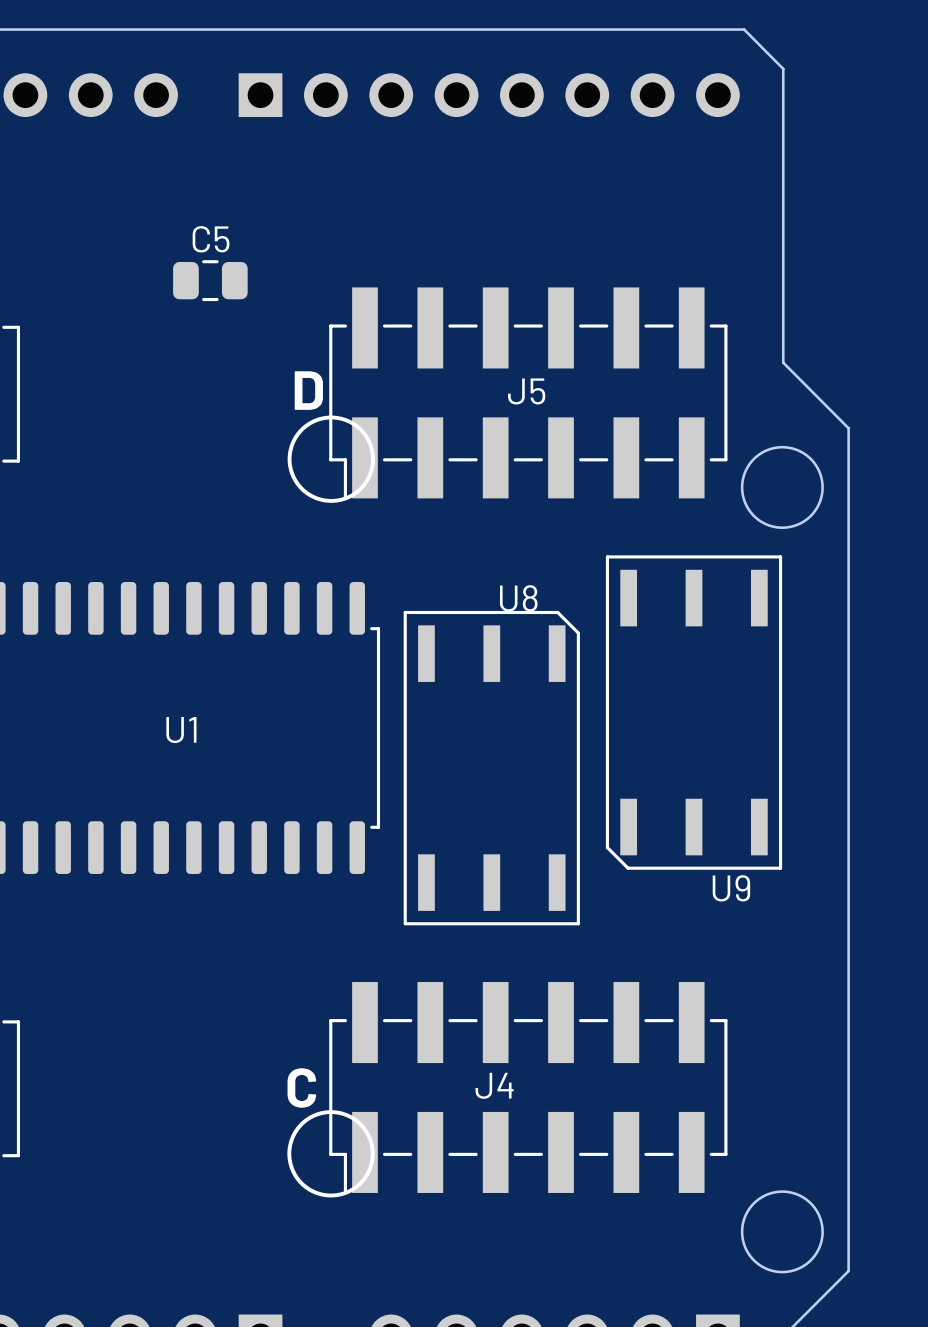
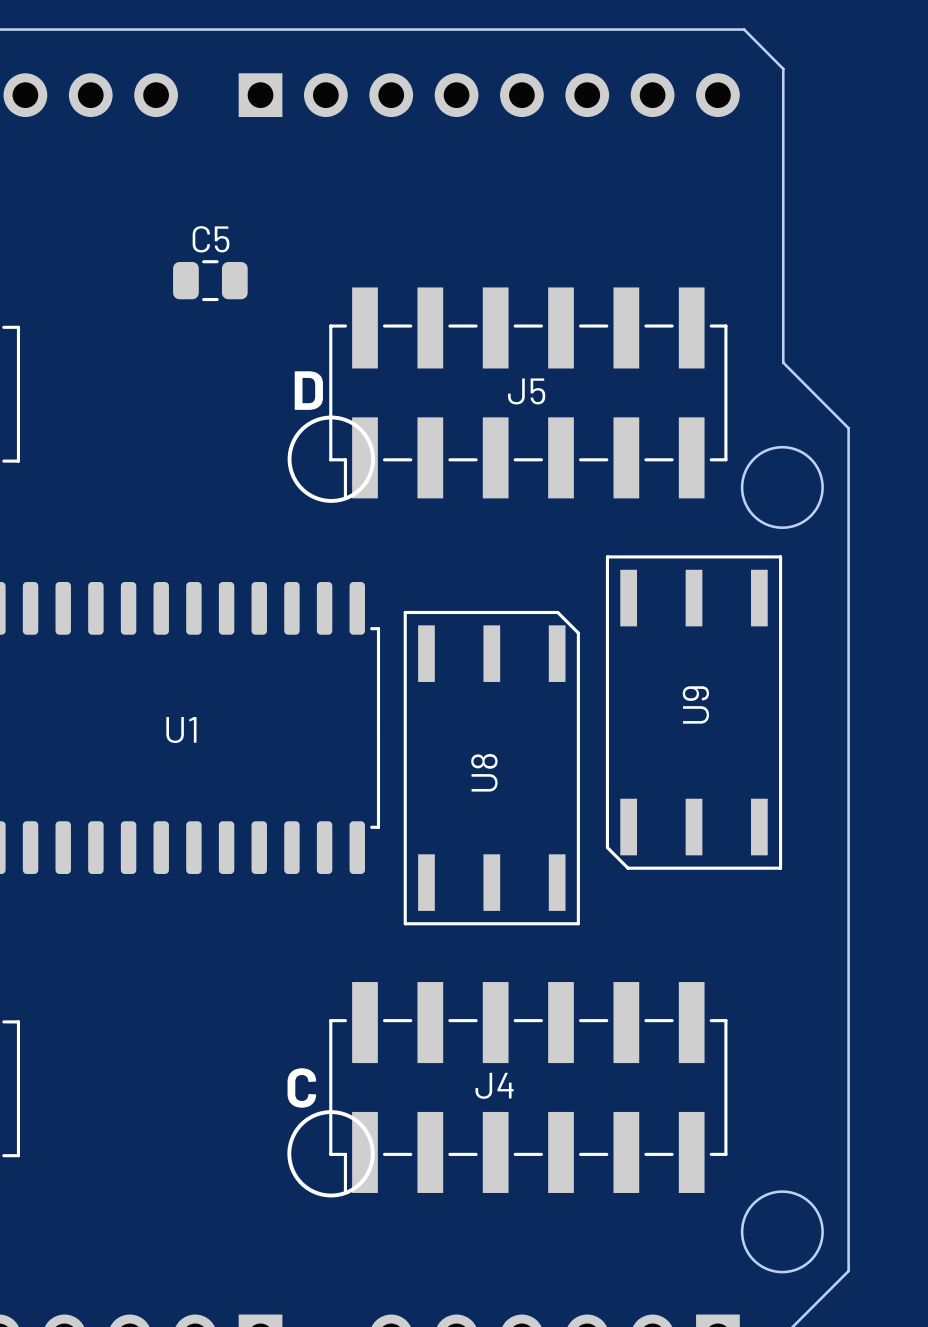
U8 name rotation: 0° (518, 598) -> 90° counterclockwise (484, 772)
U8 name position: U8 (518, 598) -> U8 (484, 772)
U9 name rotation: 0° (731, 888) -> 90° counterclockwise (695, 704)
U9 name position: U9 (731, 888) -> U9 (695, 704)

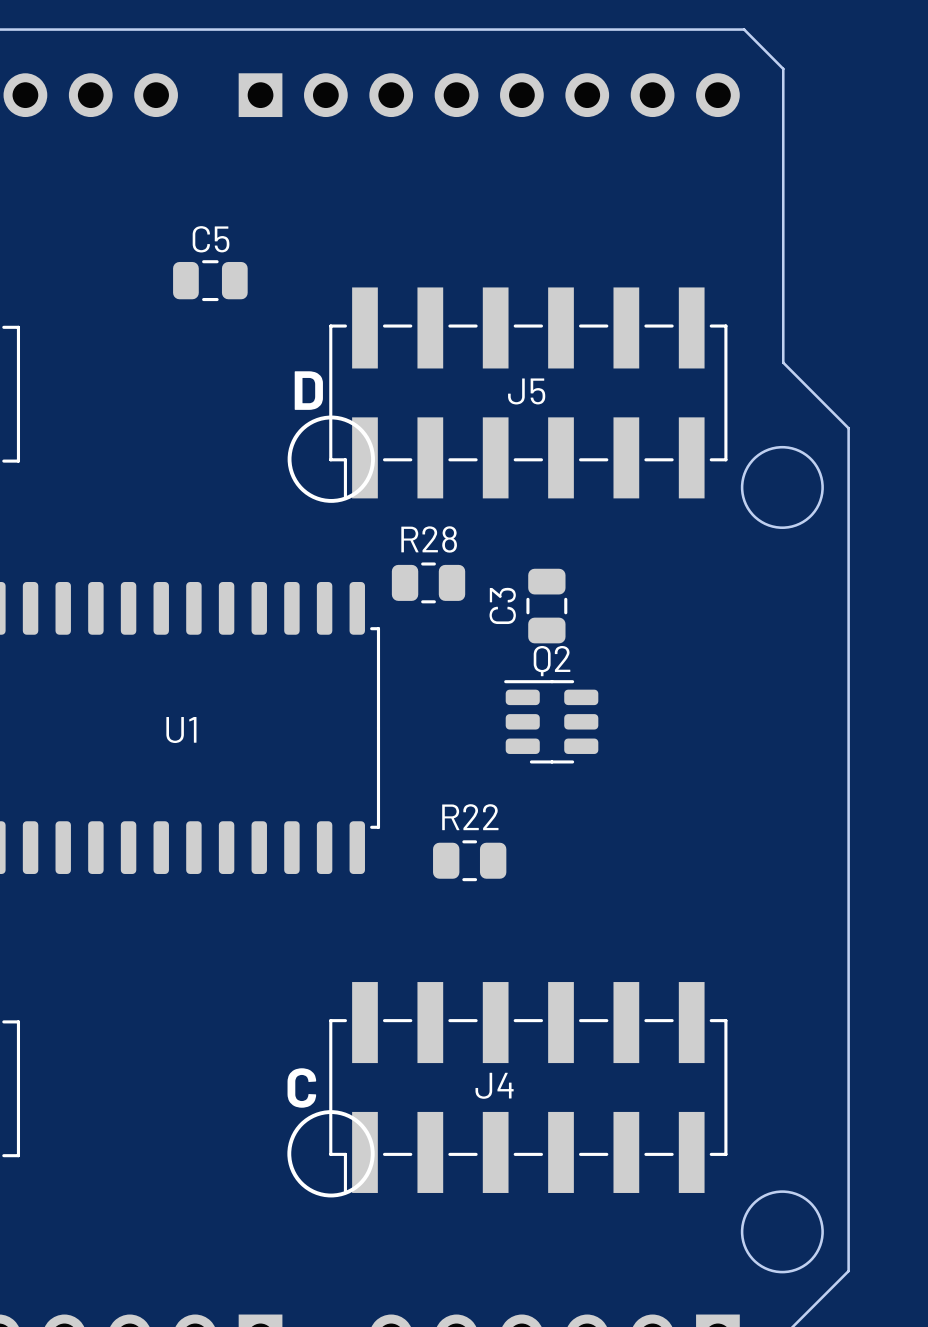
R28: none -> (428, 582)
C3: none -> (546, 606)
U9: (694, 712) -> none
Q2: none -> (551, 721)
U8: (491, 768) -> none
R22: none -> (469, 860)

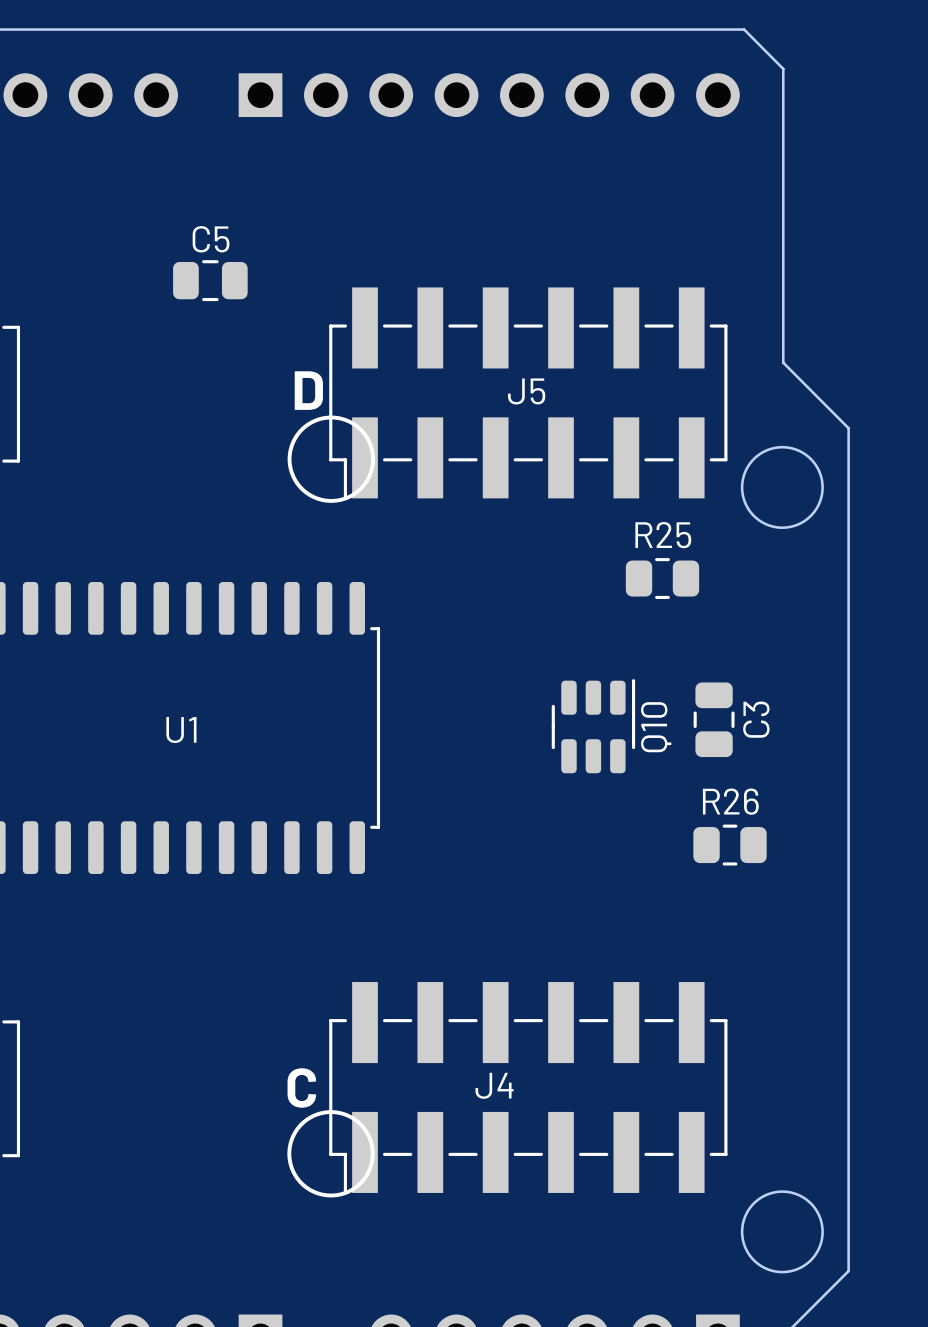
R25: none -> (662, 578)
R28: (428, 582) -> none
C3 name position: C3 (502, 605) -> C3 (756, 719)
C3 position: (546, 606) -> (714, 719)
Q2: (551, 721) -> none
Q10: none -> (593, 726)
R26: none -> (730, 845)
R22: (469, 860) -> none

